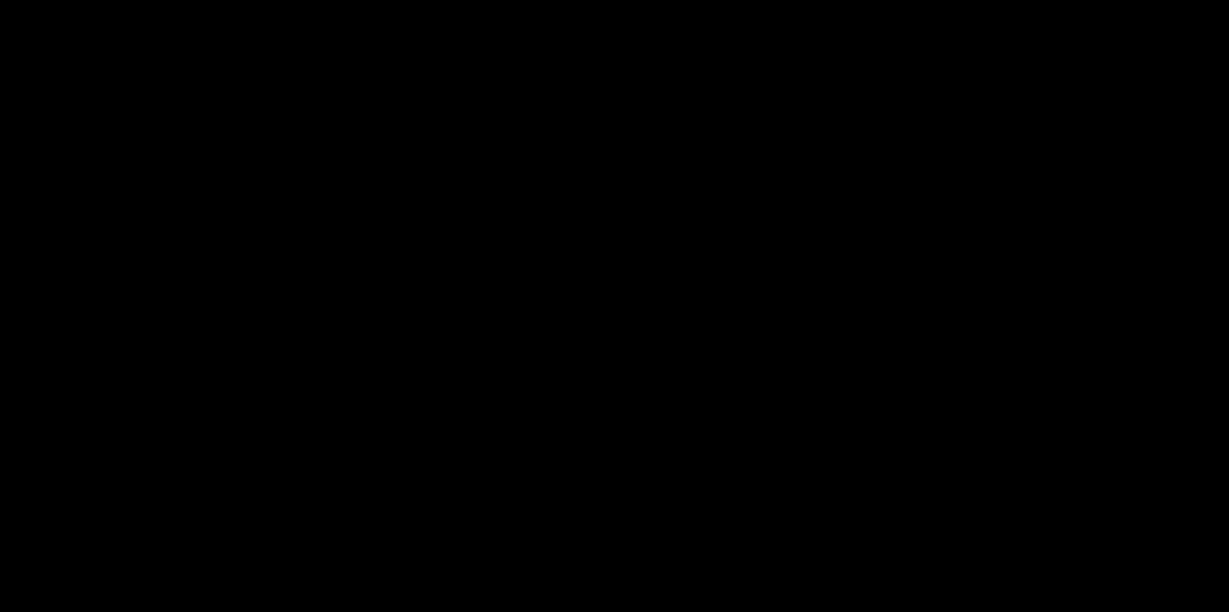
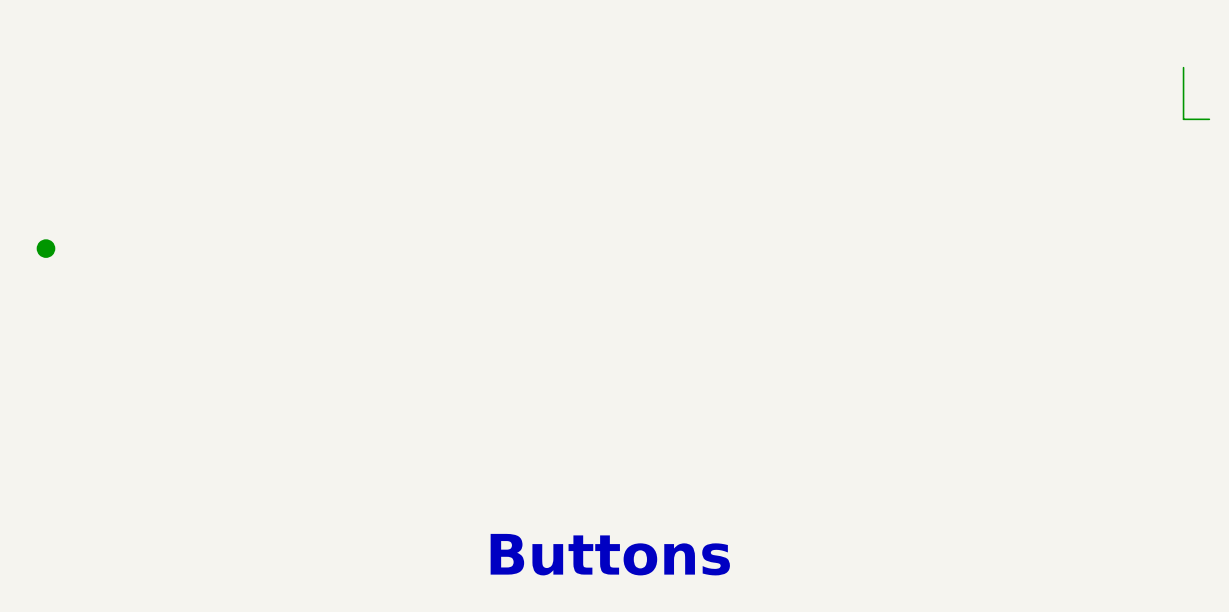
wire: none -> (1183, 67) (1183, 119) (1209, 119)
junction: none -> (45, 248)
text: none -> Buttons (610, 554)

